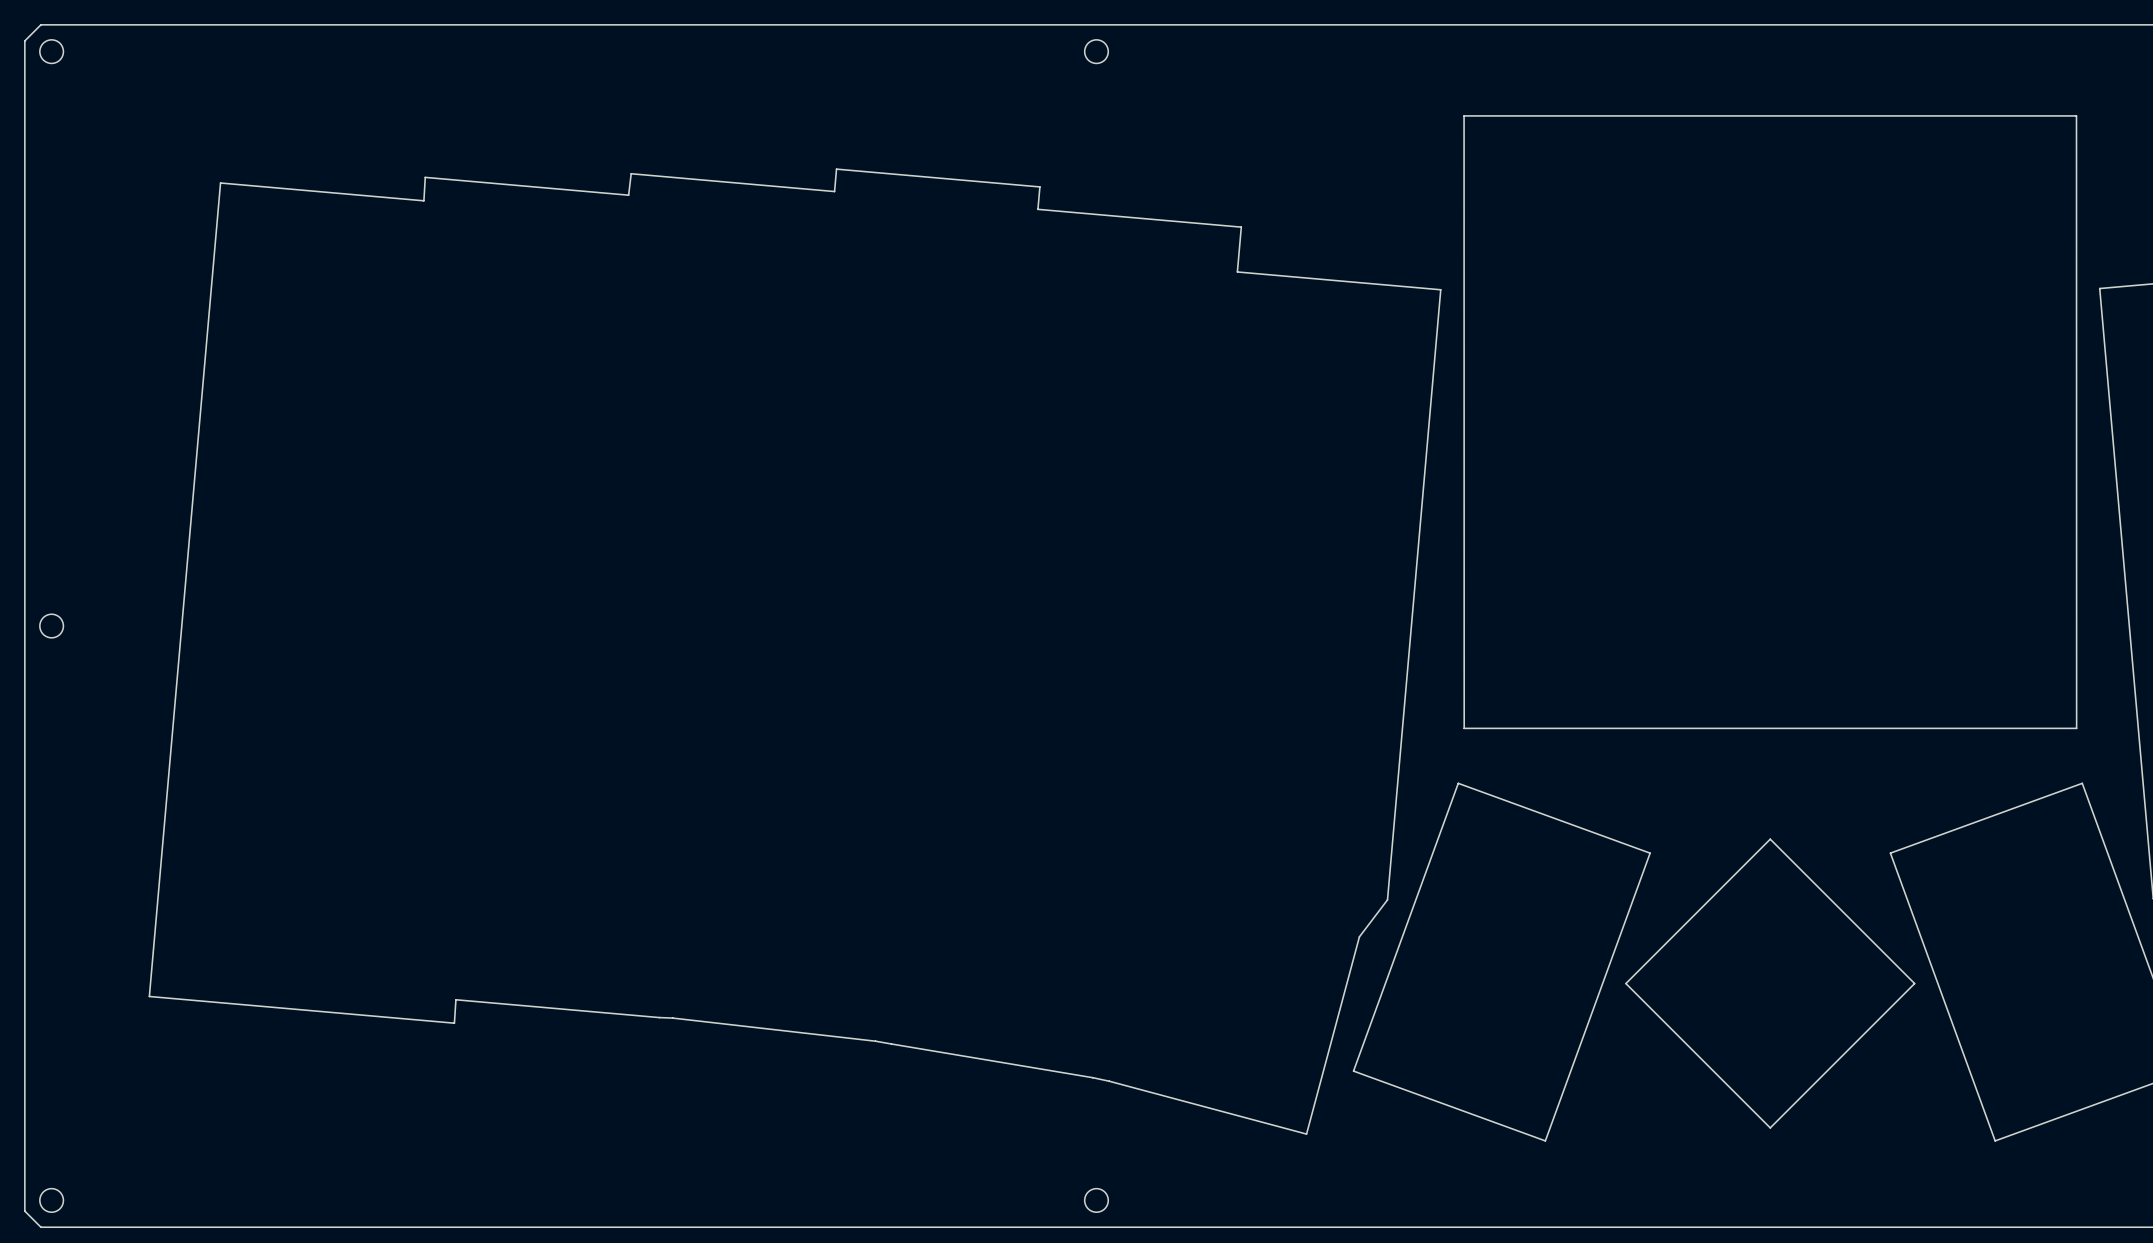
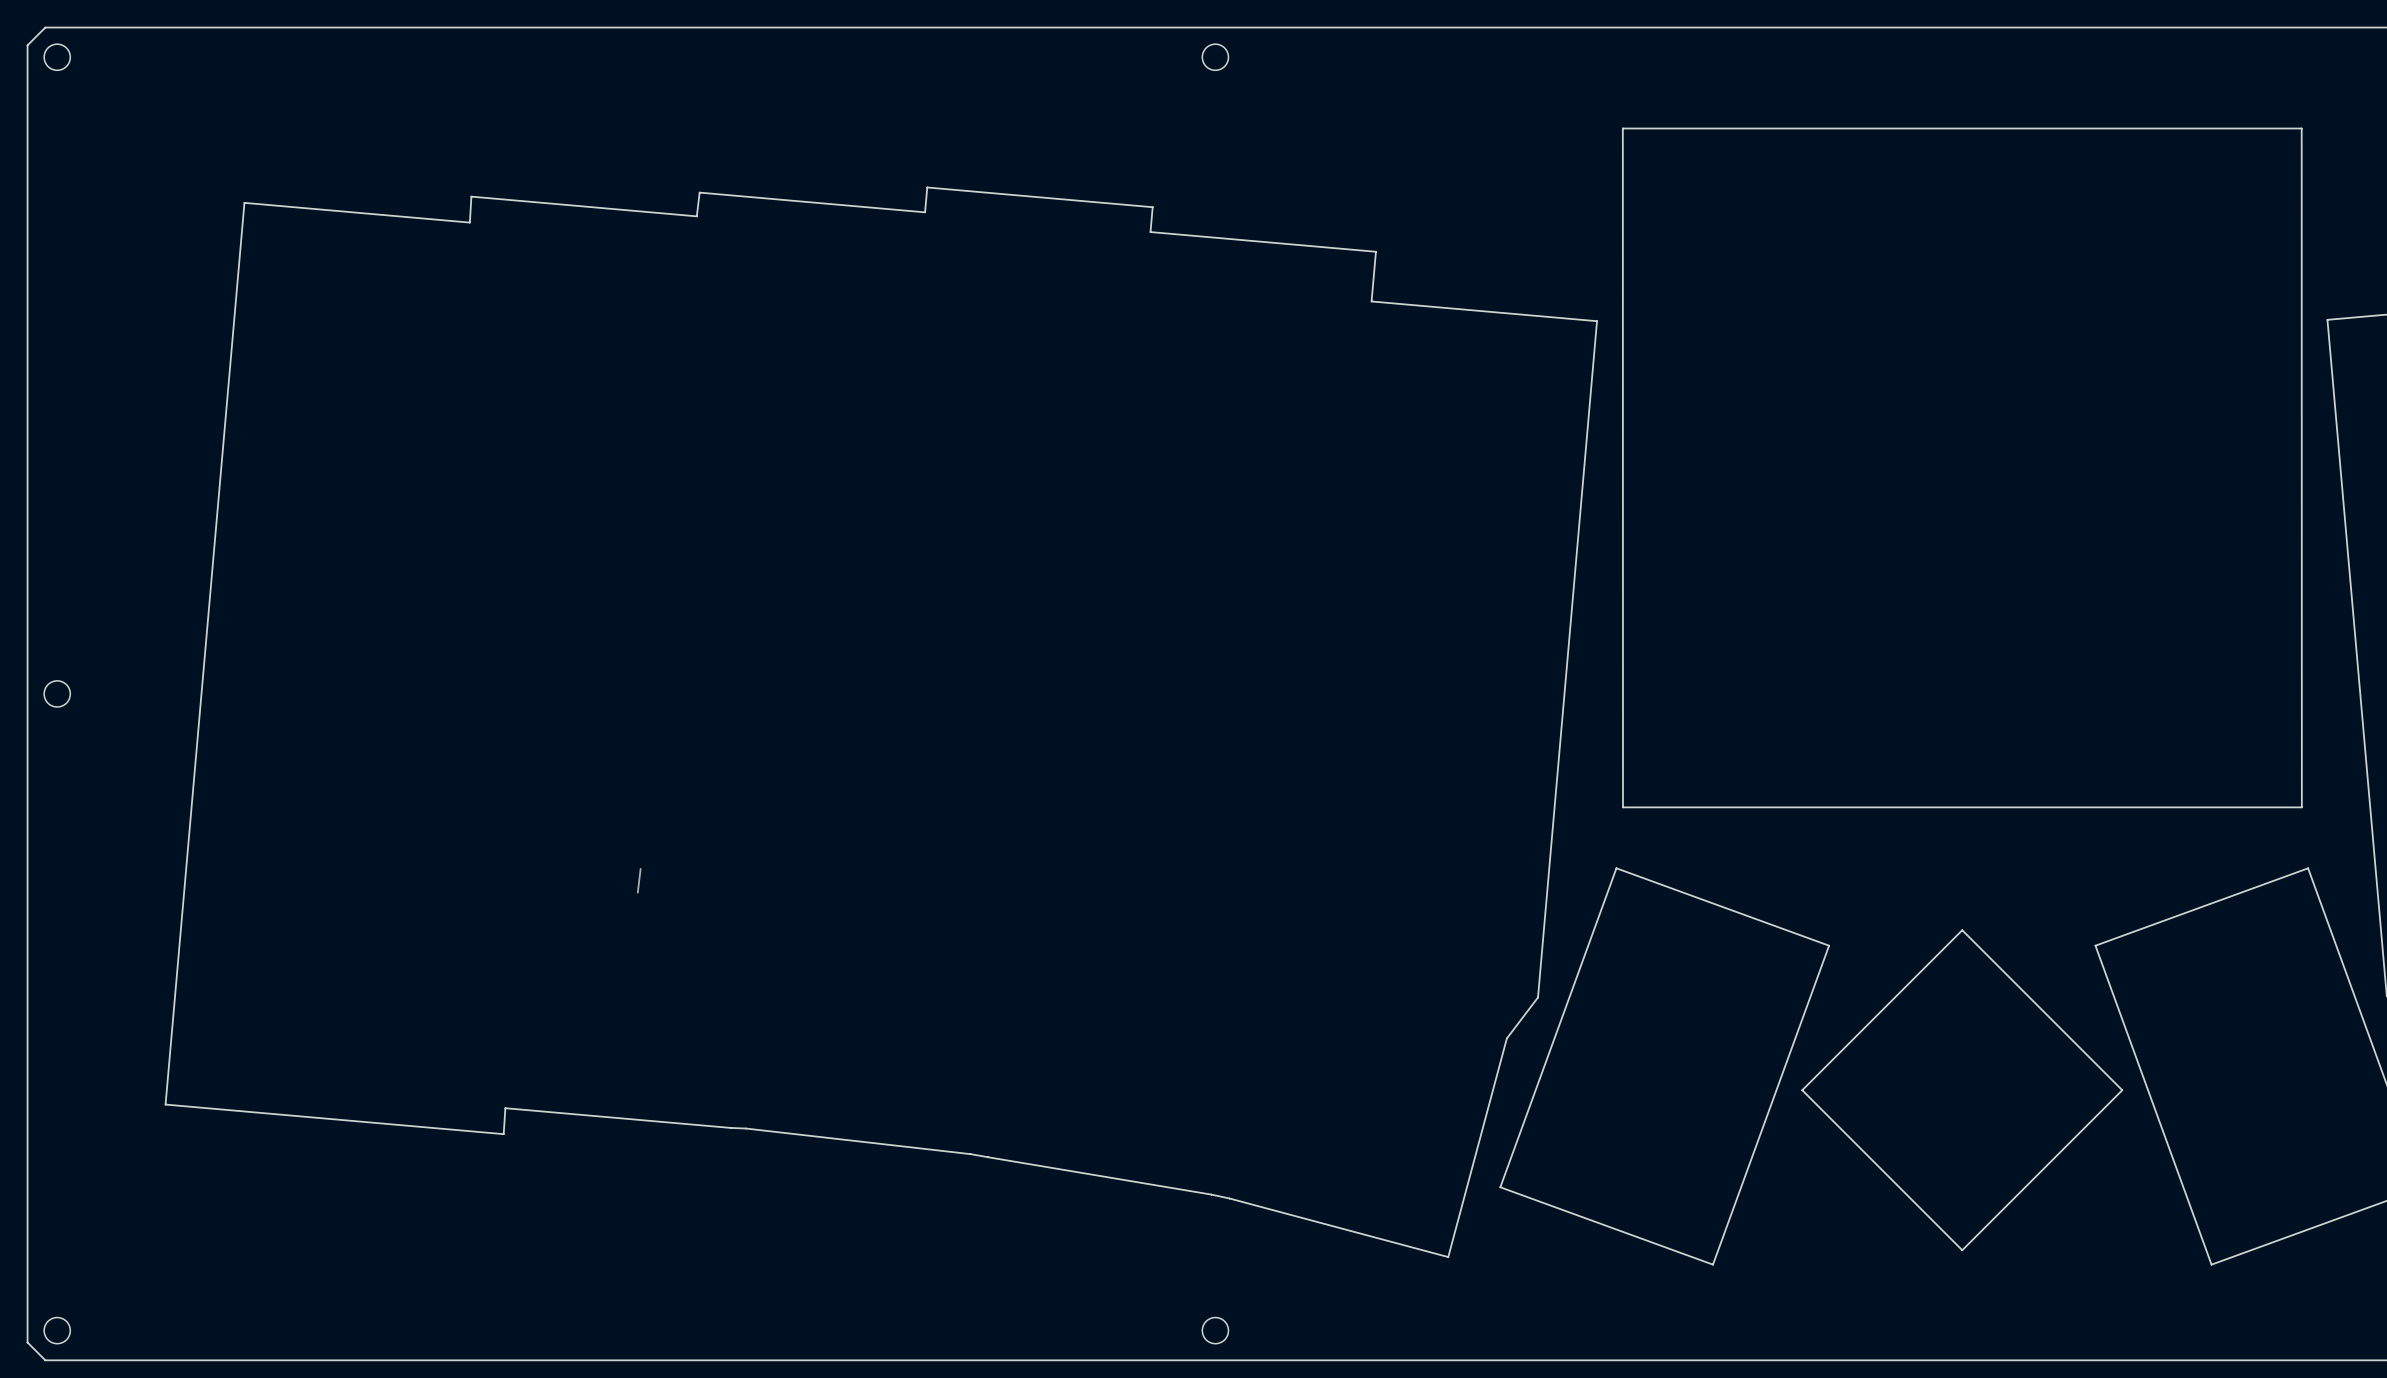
line: none -> (640, 868) (637, 892)

